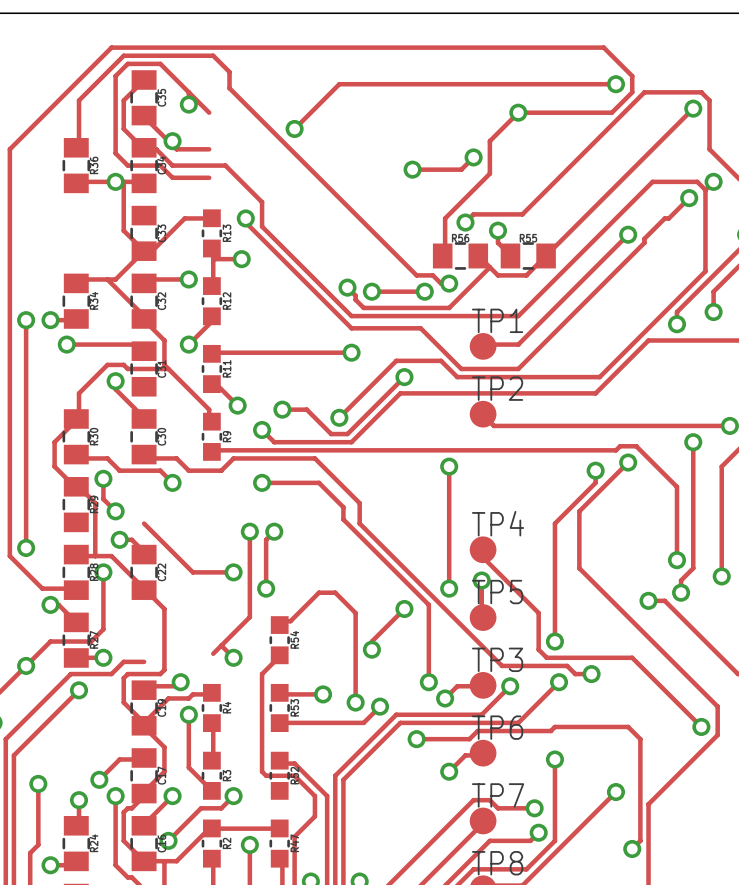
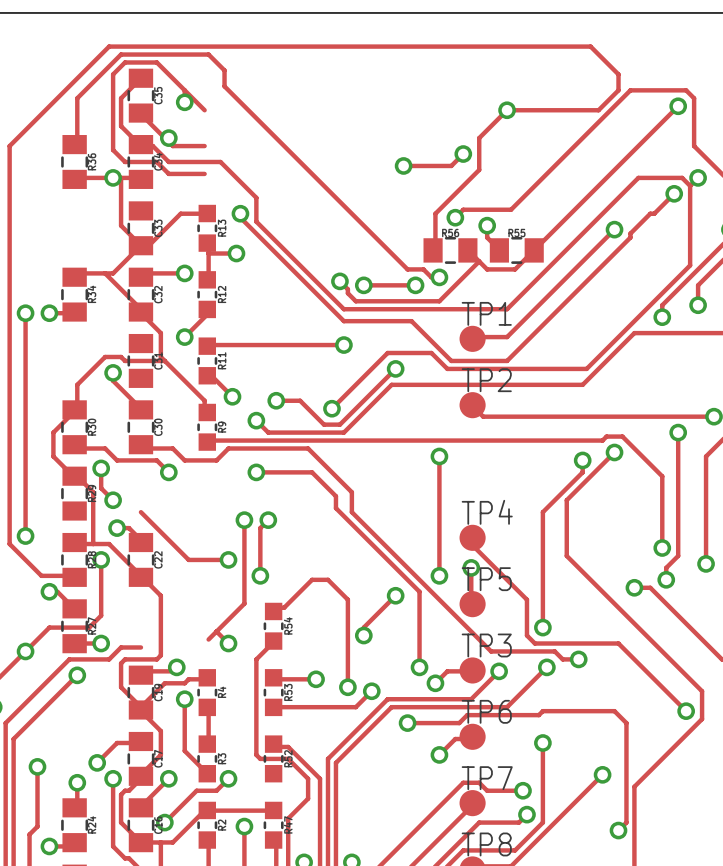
track: (615, 84) (339, 84) (294, 128) -> none
via: (615, 84) -> none
via: (294, 128) -> none
track: (66, 344) (140, 344) (144, 351) -> none
via: (66, 344) -> none

